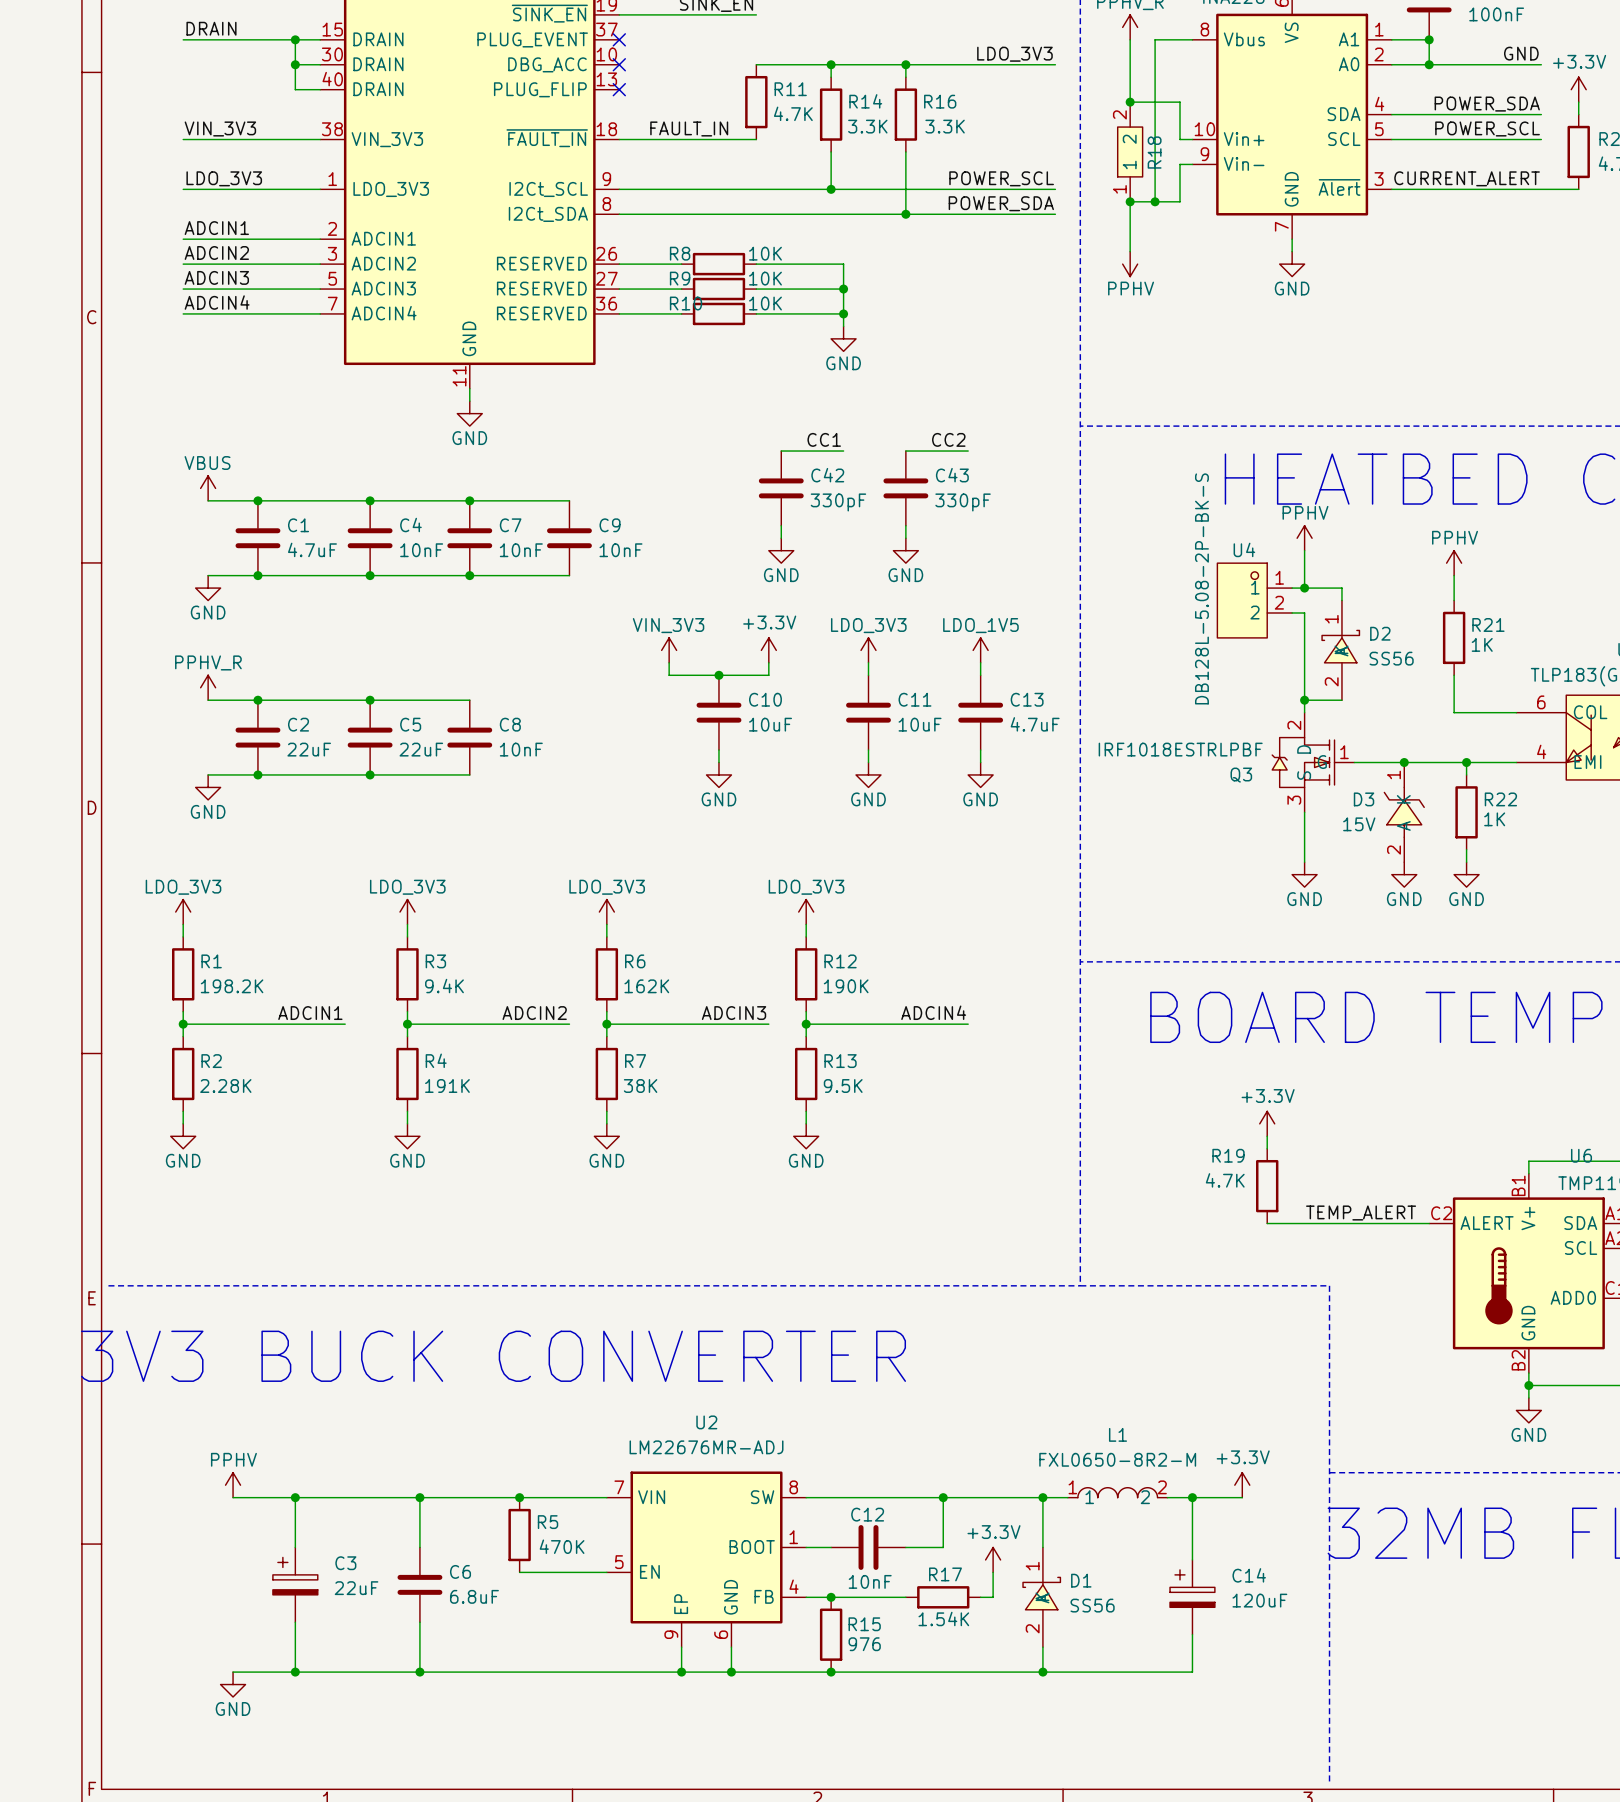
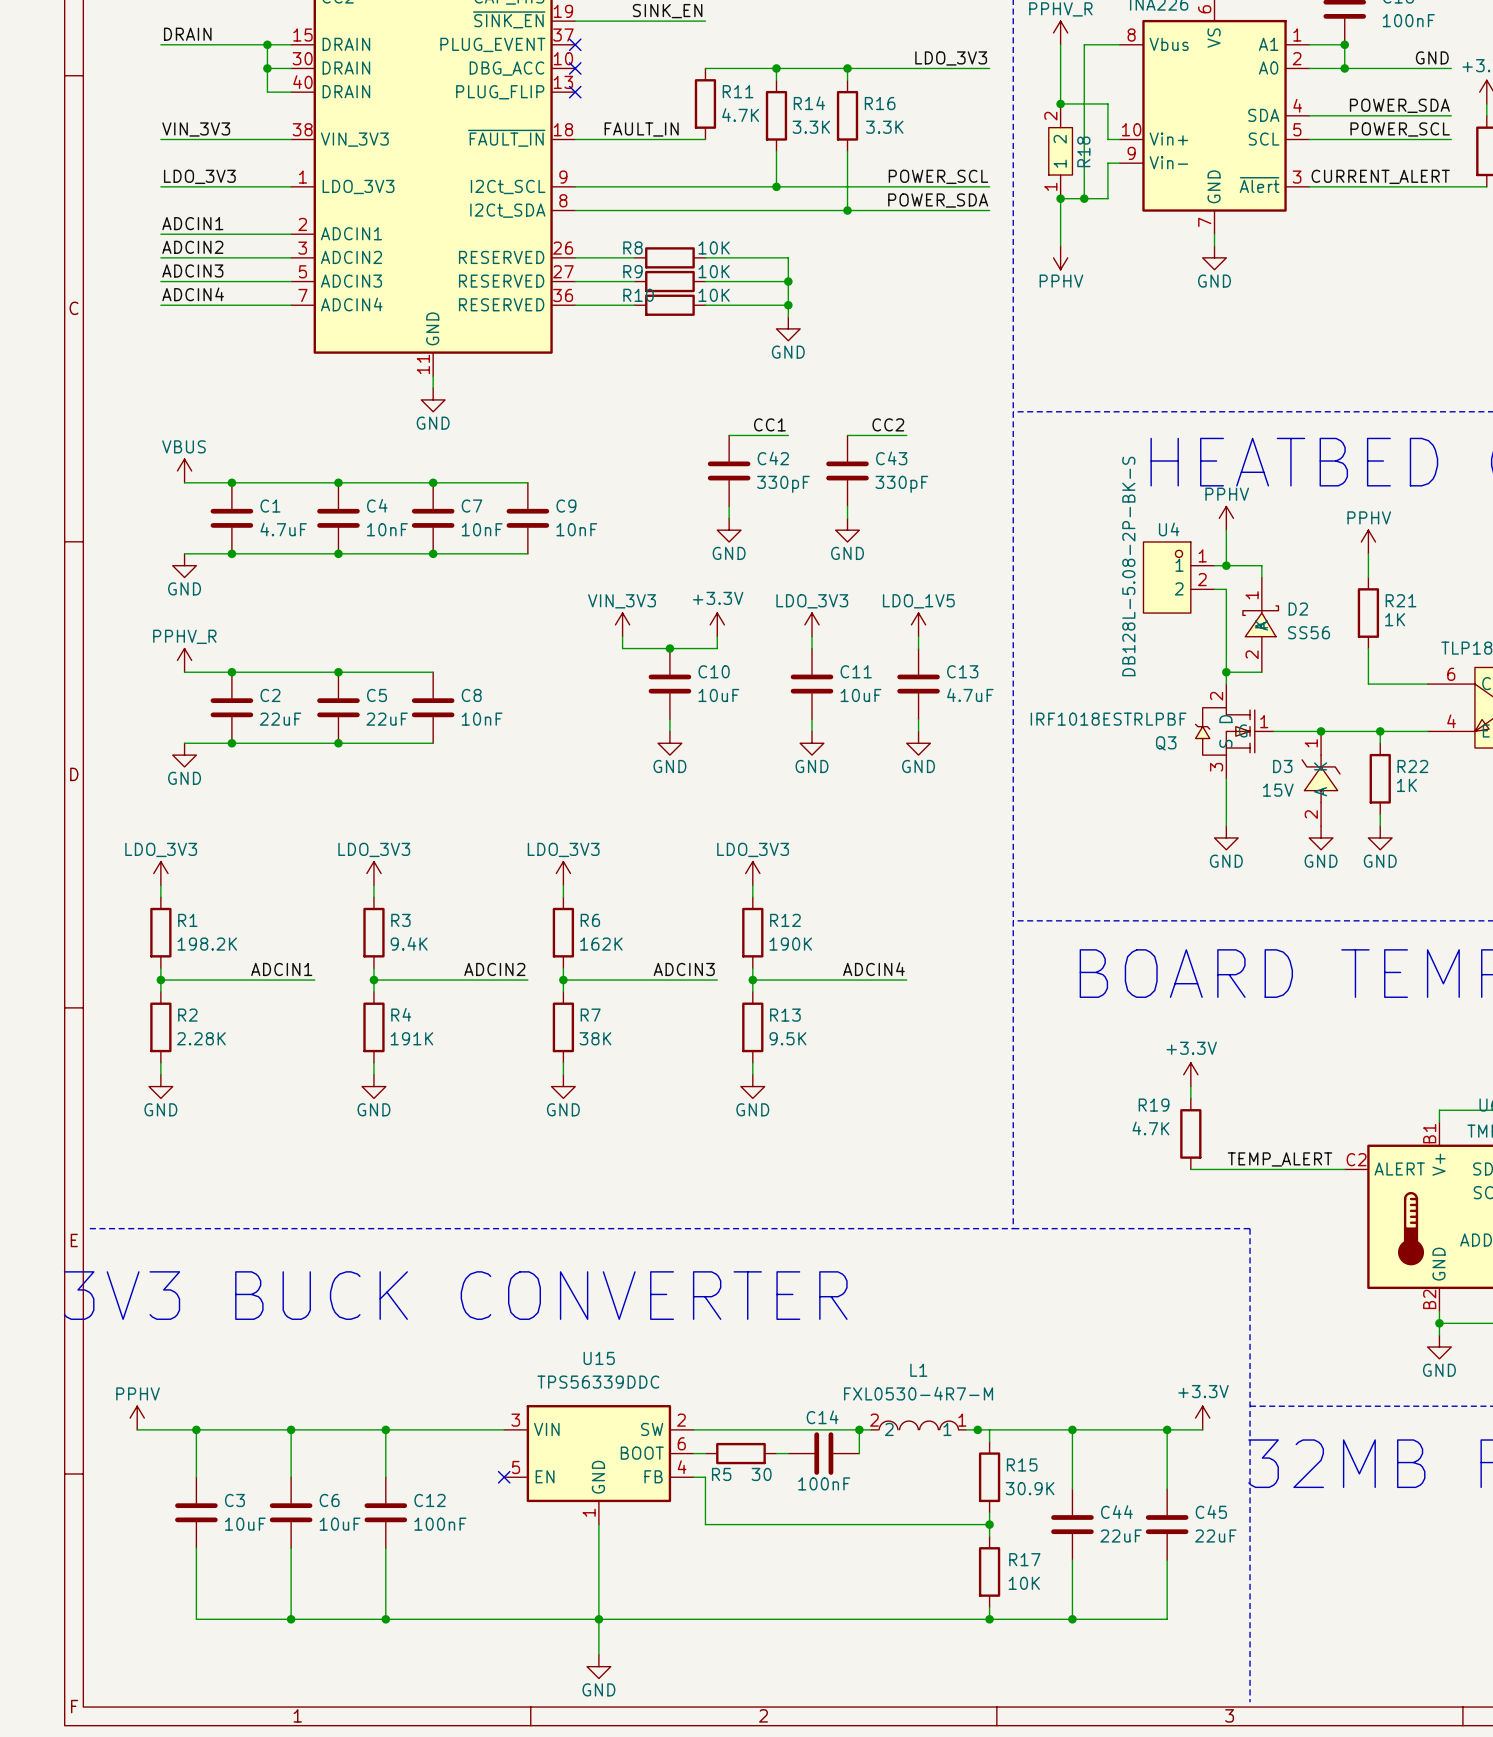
L1 value: FXL0650-8R2-M (1117, 1459) -> FXL0530-4R7-M (918, 1393)
power symbol position: PPHV (233, 1485) -> PPHV (137, 1418)
power symbol position: +3.3V (1242, 1485) -> +3.3V (1202, 1418)
L1 symbol: [1067, 1487, 1168, 1498] -> [871, 1421, 966, 1430]
wire: none -> (137, 1429) (208, 1429)
junction: none -> (196, 1429)
wire: (295, 1497) (295, 1547) -> (291, 1429) (291, 1477)
junction position: (295, 1497) -> (291, 1429)
junction: (519, 1497) -> none
wire: (930, 1497) (1030, 1497) -> (1001, 1429) (1096, 1429)
wire: (943, 1497) (943, 1547) (905, 1547) -> none
junction position: (943, 1497) -> (859, 1429)
wire: (1042, 1497) (1042, 1547) -> none
wire: none -> (989, 1429) (989, 1441)
junction: none -> (1072, 1429)
wire: (1192, 1497) (1192, 1559) -> (1072, 1429) (1072, 1489)
junction: (1192, 1497) -> none
junction: none -> (1167, 1429)
wire: none -> (1202, 1429) (1167, 1429) (1167, 1489)
R5 name position: R5 (548, 1522) -> R5 (721, 1474)
wire: none -> (776, 1453) (788, 1453)
U15: none -> TPS56339DDC (598, 1464)
R5 rotation: 0° (519, 1535) -> 90° clockwise (740, 1453)
R5 position: (519, 1535) -> (740, 1453)
R5 value: 470K (562, 1546) -> 30 (761, 1474)
C3 symbol: [272, 1547, 318, 1623] -> [175, 1477, 218, 1549]
no-connect mark: none -> (504, 1477)
wire: (806, 1547) (831, 1547) -> none
C12: 10nF (868, 1547) -> none
U2: LM22676MR-ADJ (706, 1559) -> none
power symbol: +3.3V (993, 1559) -> none
C14 symbol: [1170, 1559, 1215, 1635] -> [788, 1432, 860, 1475]
C6 name: C6 (460, 1571) -> C12 (429, 1500)
wire: (519, 1572) (606, 1572) -> none
wire: (993, 1572) (993, 1597) -> (989, 1524) (930, 1524)
R17 name position: R17 (945, 1574) -> R17 (1024, 1559)
C14 name position: C14 (1249, 1575) -> C14 (822, 1417)
C6: none -> 10uF (291, 1512)
C3 value: 22uF (356, 1588) -> 10uF (245, 1524)
C6 value: 6.8uF (474, 1596) -> 100nF (440, 1524)
wire: none -> (598, 1524) (598, 1654)
junction: (831, 1597) -> none
wire: none -> (847, 1524) (918, 1524)
R17 rotation: 0° (943, 1597) -> 90° clockwise (989, 1571)
R17 position: (943, 1597) -> (989, 1571)
D1: SS56 (1041, 1597) -> none
junction: none -> (989, 1524)
C44: none -> 22uF (1072, 1524)
C45: none -> 22uF (1167, 1524)
C14 value: 120uF (1259, 1600) -> 100nF (824, 1483)
R17 value: 1.54K (943, 1618) -> 10K (1024, 1583)
wire: none -> (196, 1548) (196, 1619) (1167, 1619) (1167, 1560)
wire: (295, 1622) (295, 1672) -> (196, 1429) (196, 1477)
wire: none -> (291, 1548) (291, 1619)
R15 name position: R15 (864, 1624) -> R15 (1022, 1464)
R15 position: (831, 1634) -> (989, 1477)
wire: none -> (1072, 1560) (1072, 1619)
wire: (1192, 1634) (1192, 1672) (233, 1672) -> none
R15 value: 976 (864, 1644) -> 30.9K (1030, 1488)
wire: (681, 1647) (681, 1672) -> none
wire: (731, 1647) (731, 1672) -> (859, 1429) (859, 1453)
wire: (1042, 1647) (1042, 1672) -> (989, 1512) (989, 1536)
junction position: (295, 1672) -> (291, 1619)
wire: none -> (385, 1595) (385, 1619)
junction position: (419, 1672) -> (385, 1619)
junction position: (681, 1672) -> (598, 1619)
junction: (731, 1672) -> none
junction: (831, 1672) -> none
junction position: (1042, 1672) -> (989, 1619)
power symbol: GND (233, 1684) -> none
wire: none -> (989, 1607) (989, 1619)
junction: none -> (1072, 1619)
power symbol: none -> GND (598, 1666)

